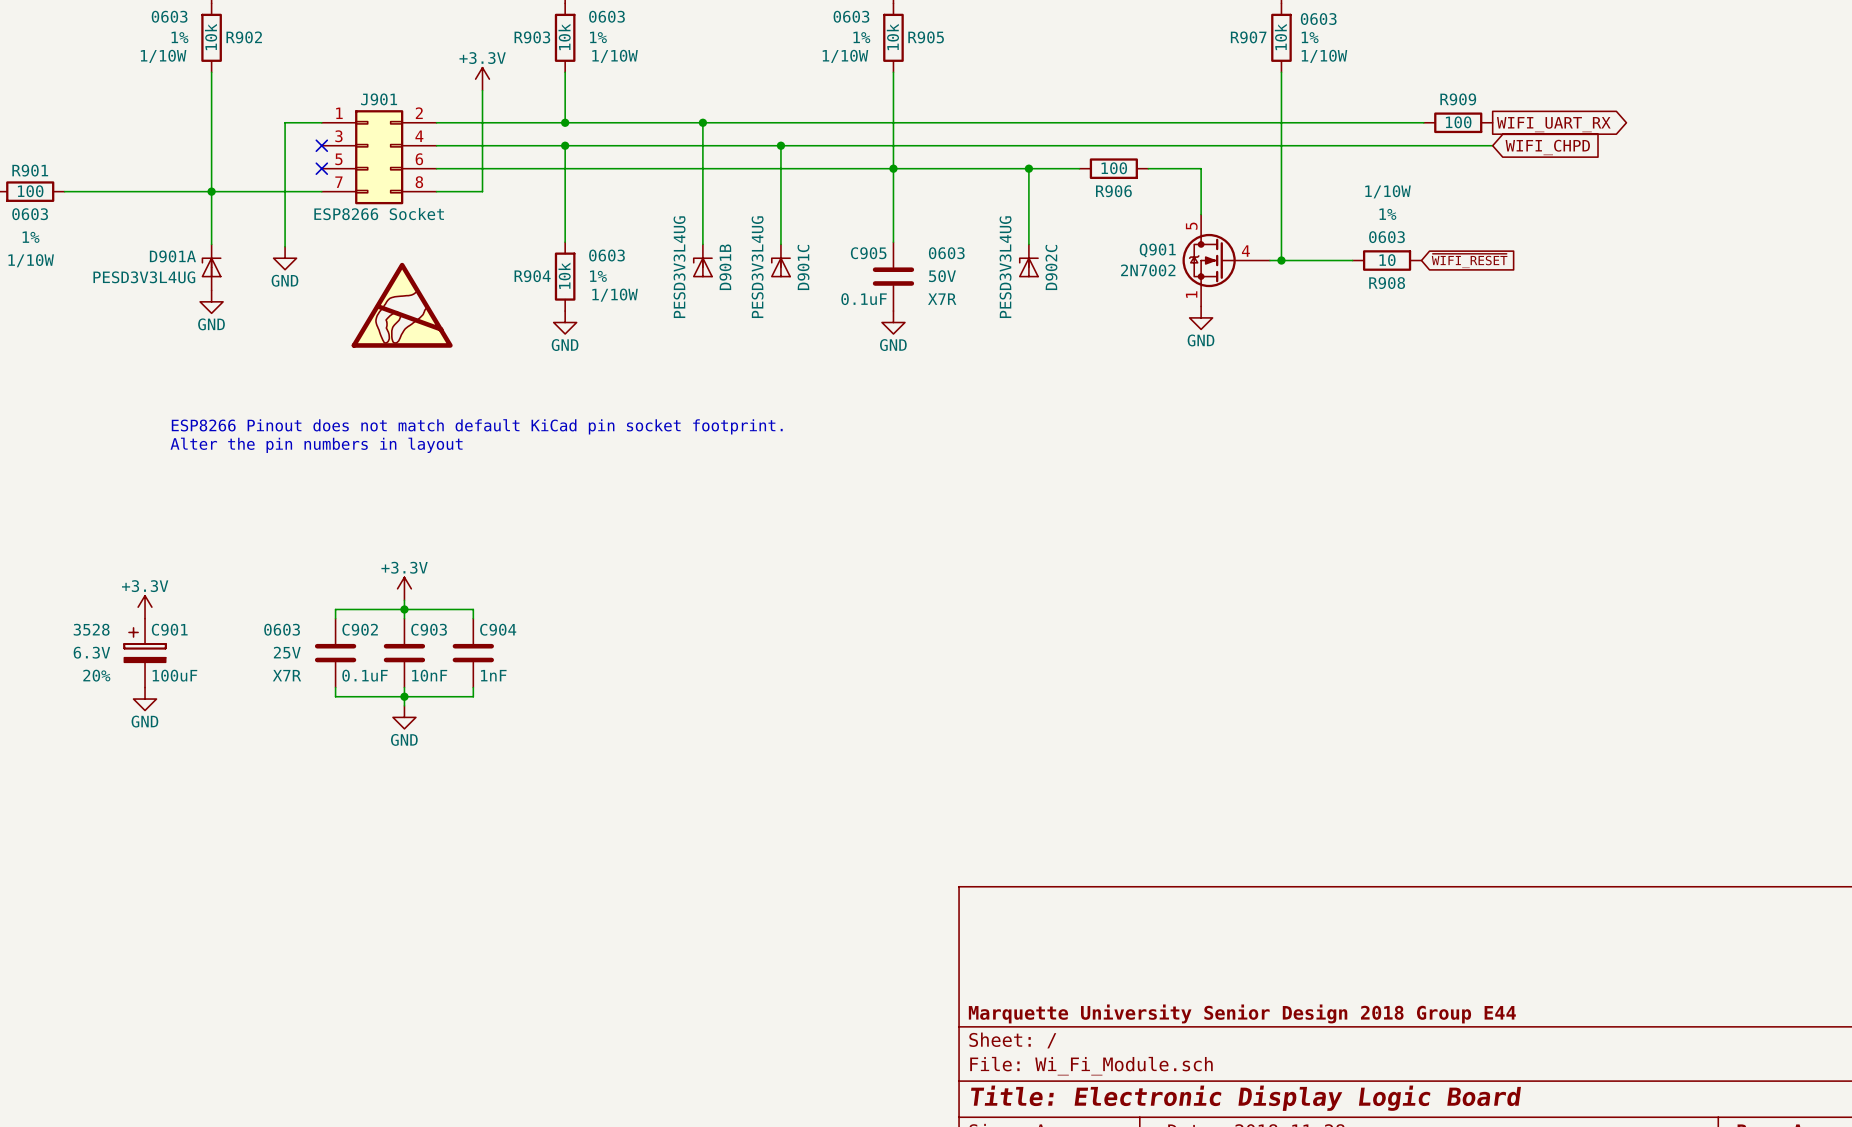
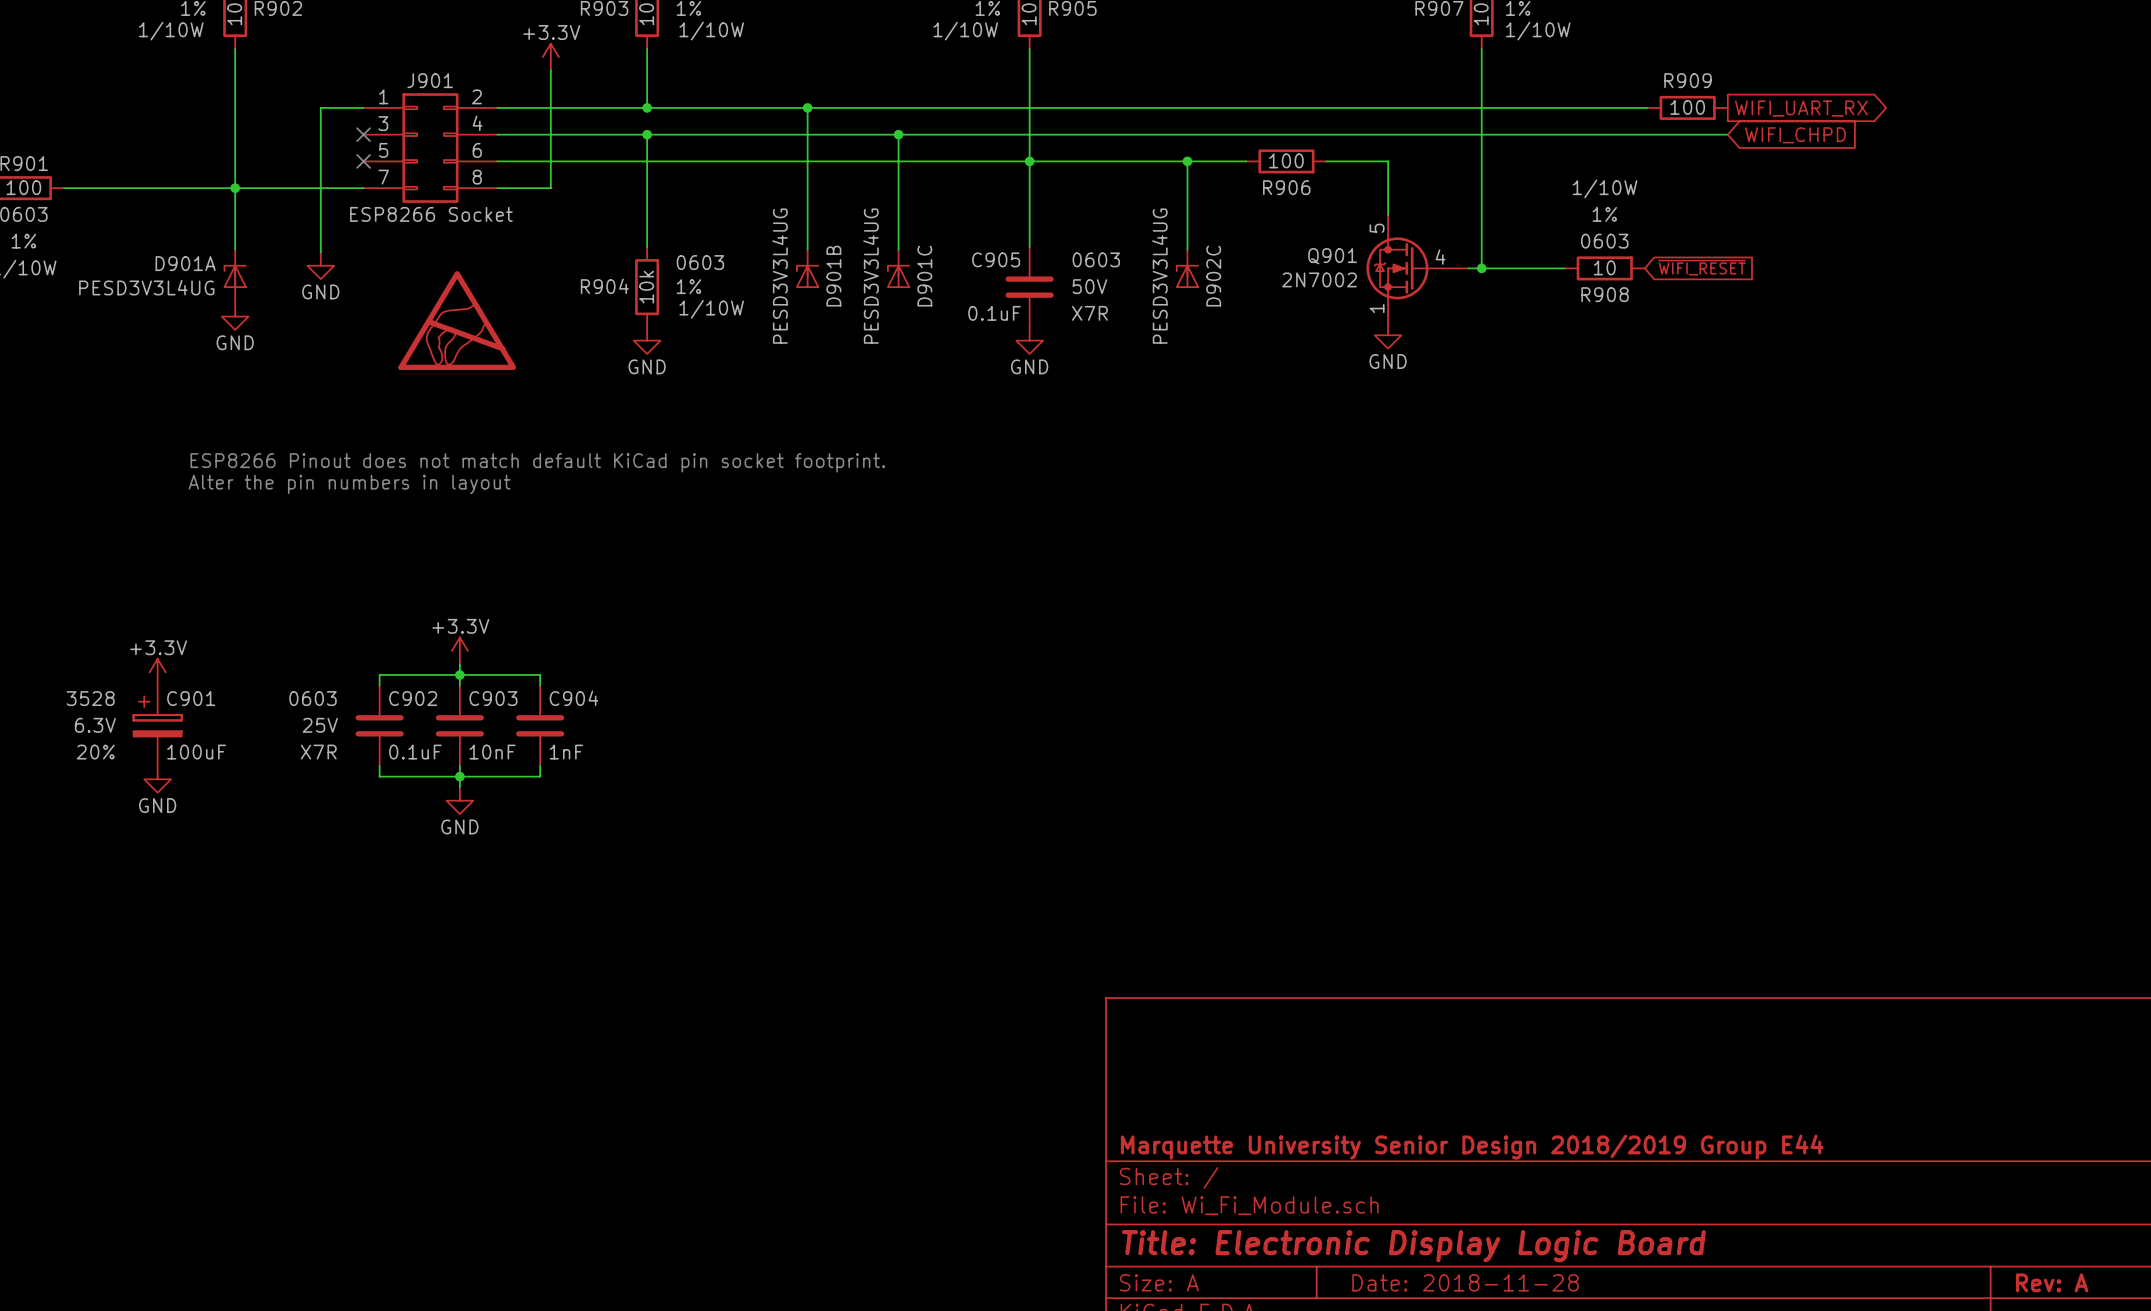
title block: Marquette University Senior Design 2018 Group E44 (1242, 1013) -> Marquette University Senior Design 2018/2019 Group E44 (1472, 1147)

